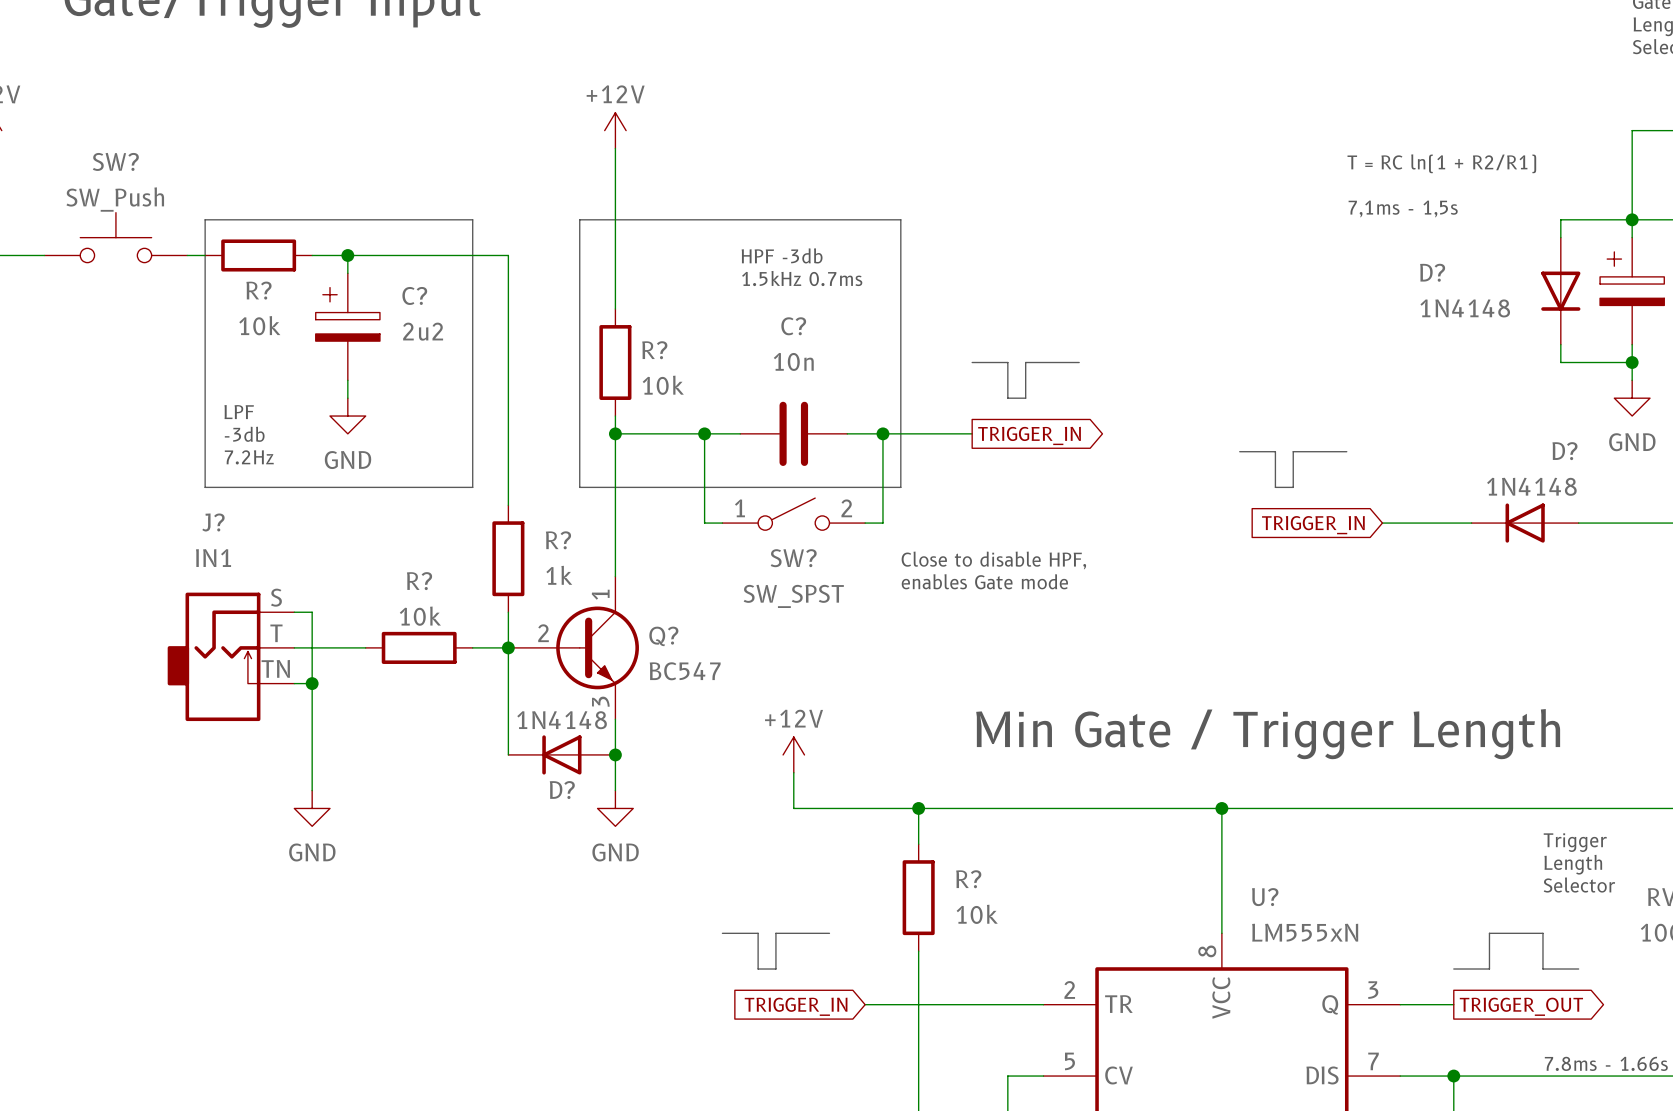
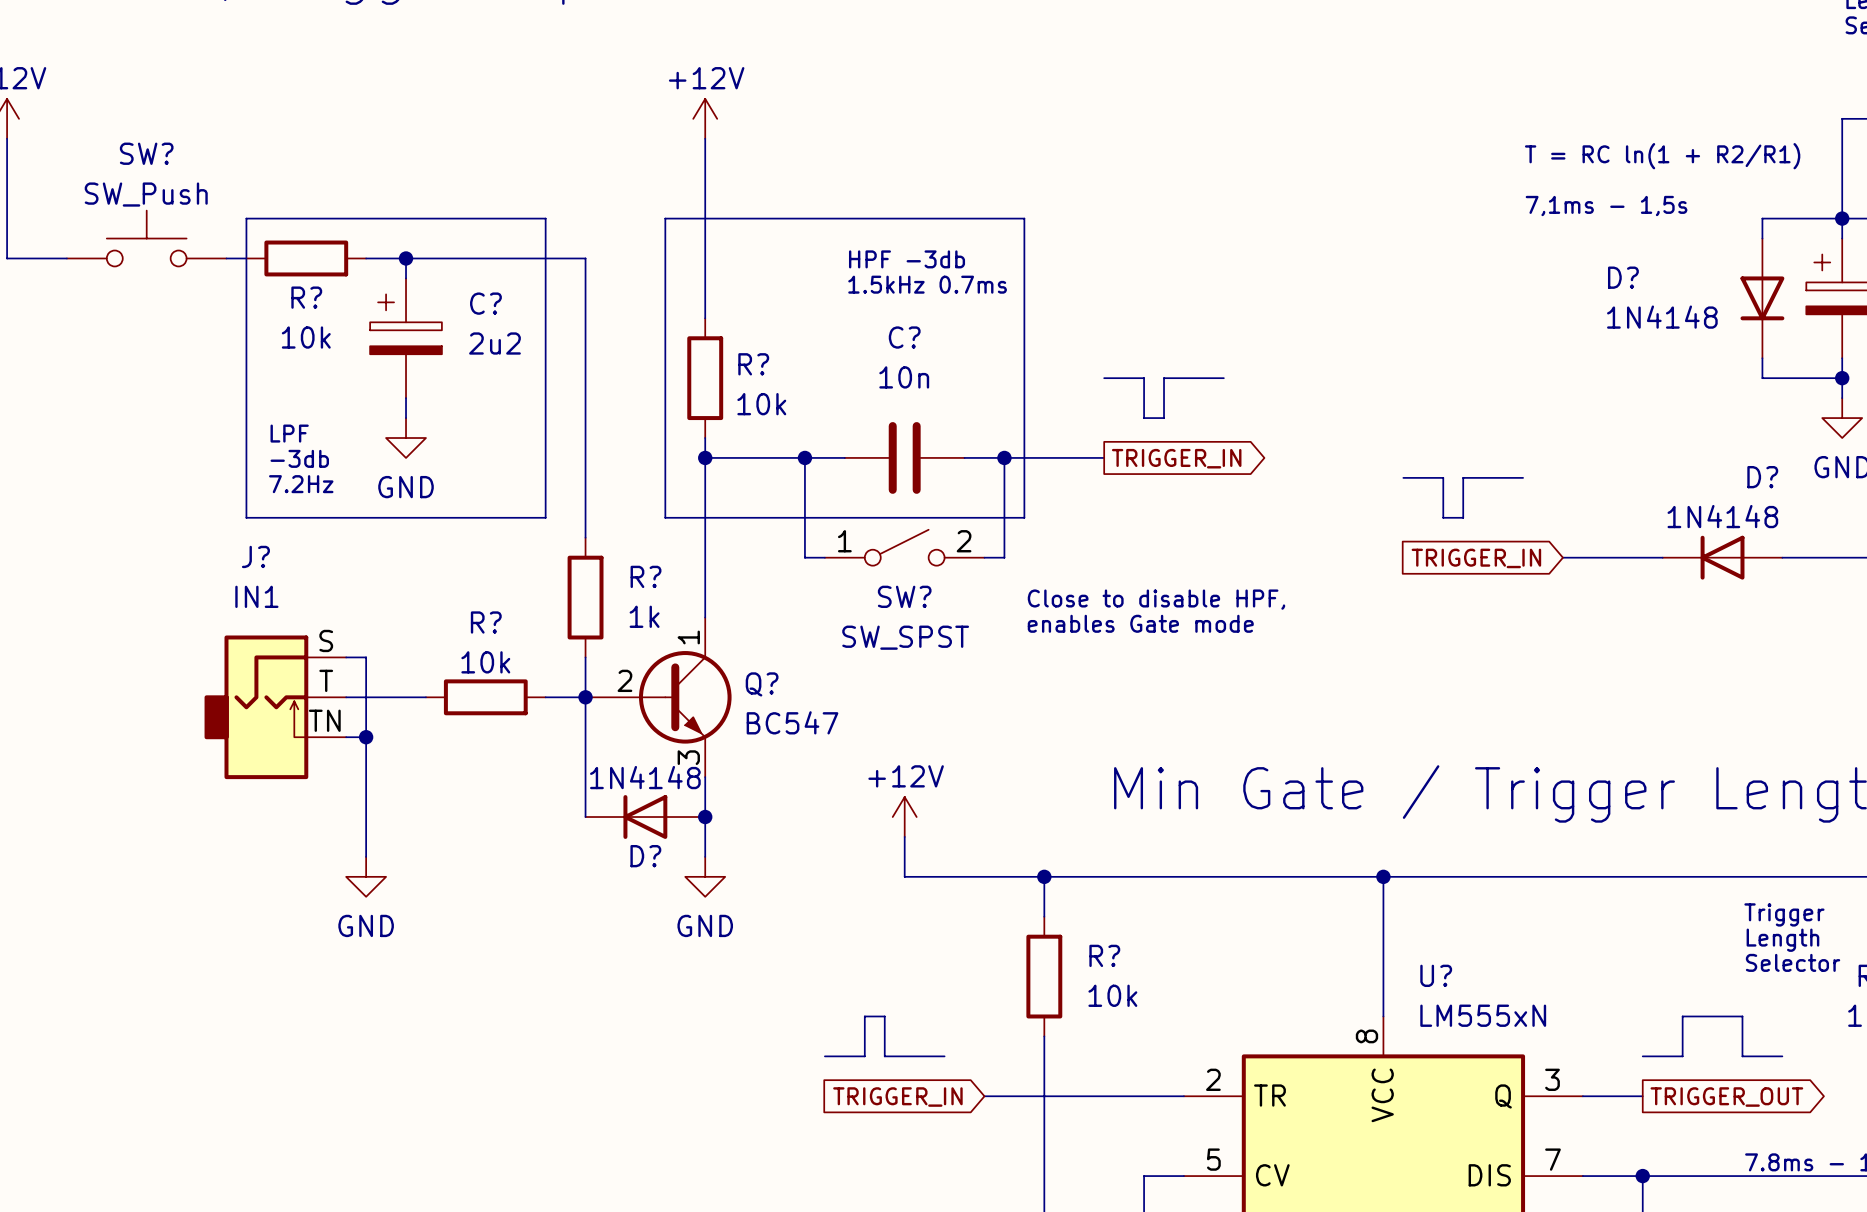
line: (722, 933) (758, 933) -> (884, 1016) (864, 1016)
line: (775, 933) (829, 933) -> (884, 1056) (944, 1056)
line: (758, 969) (775, 969) -> (864, 1056) (824, 1056)

